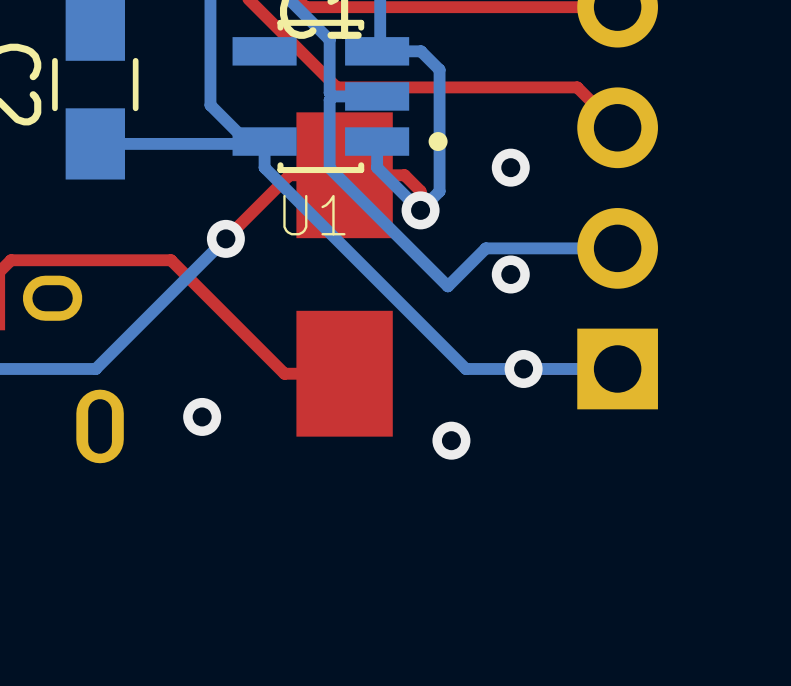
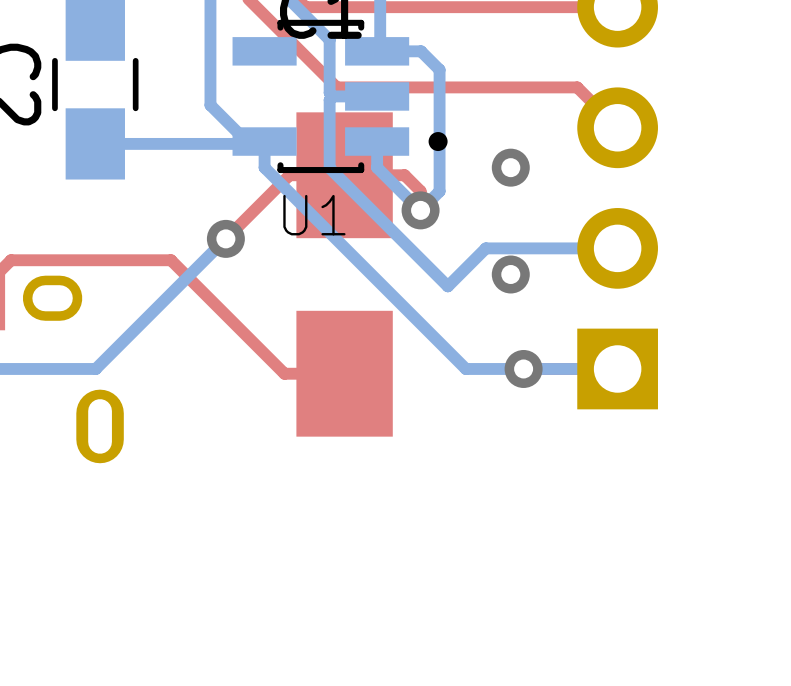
via: (202, 416) -> none
via: (451, 440) -> none

